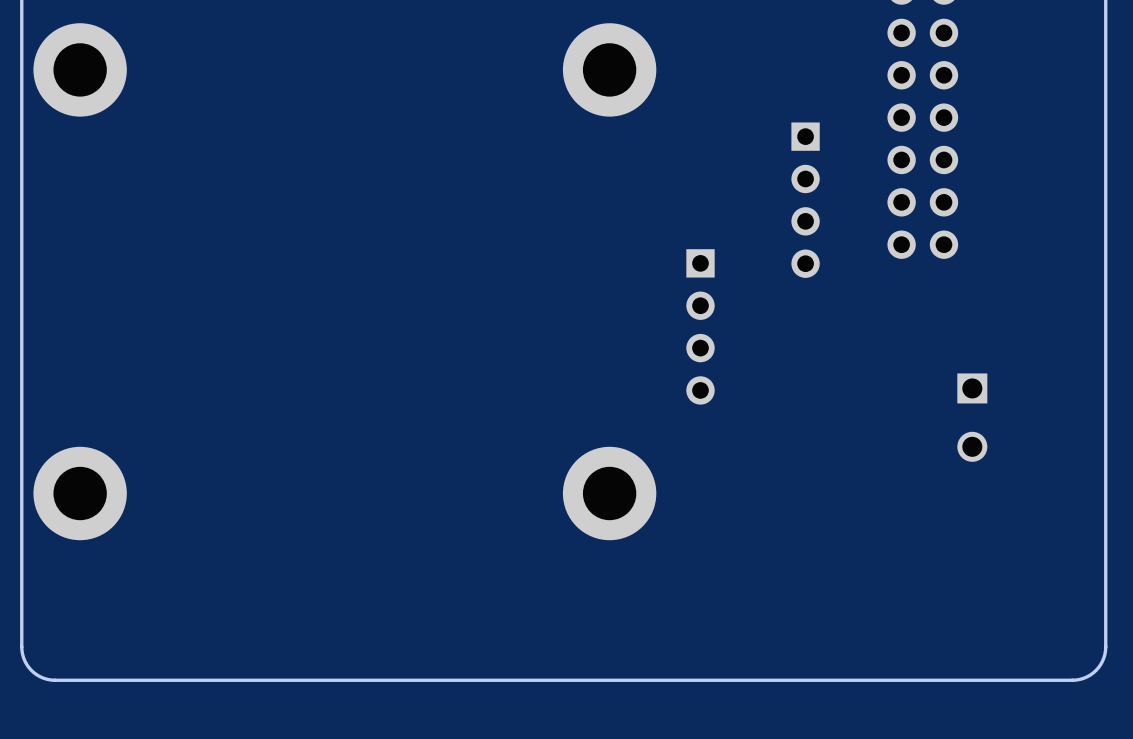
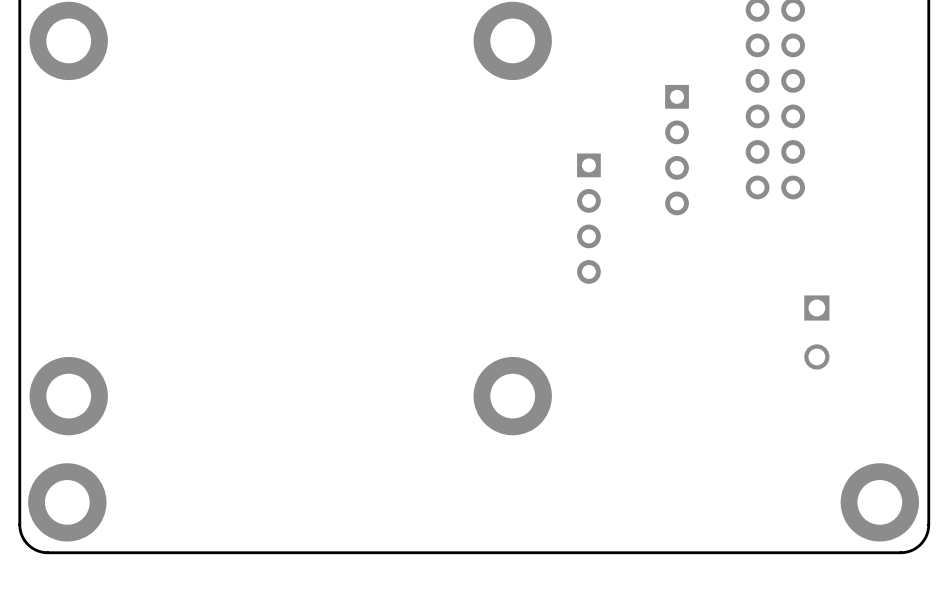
part position: (700, 326) -> (588, 218)
part: none -> (67, 502)
part: none -> (879, 502)

